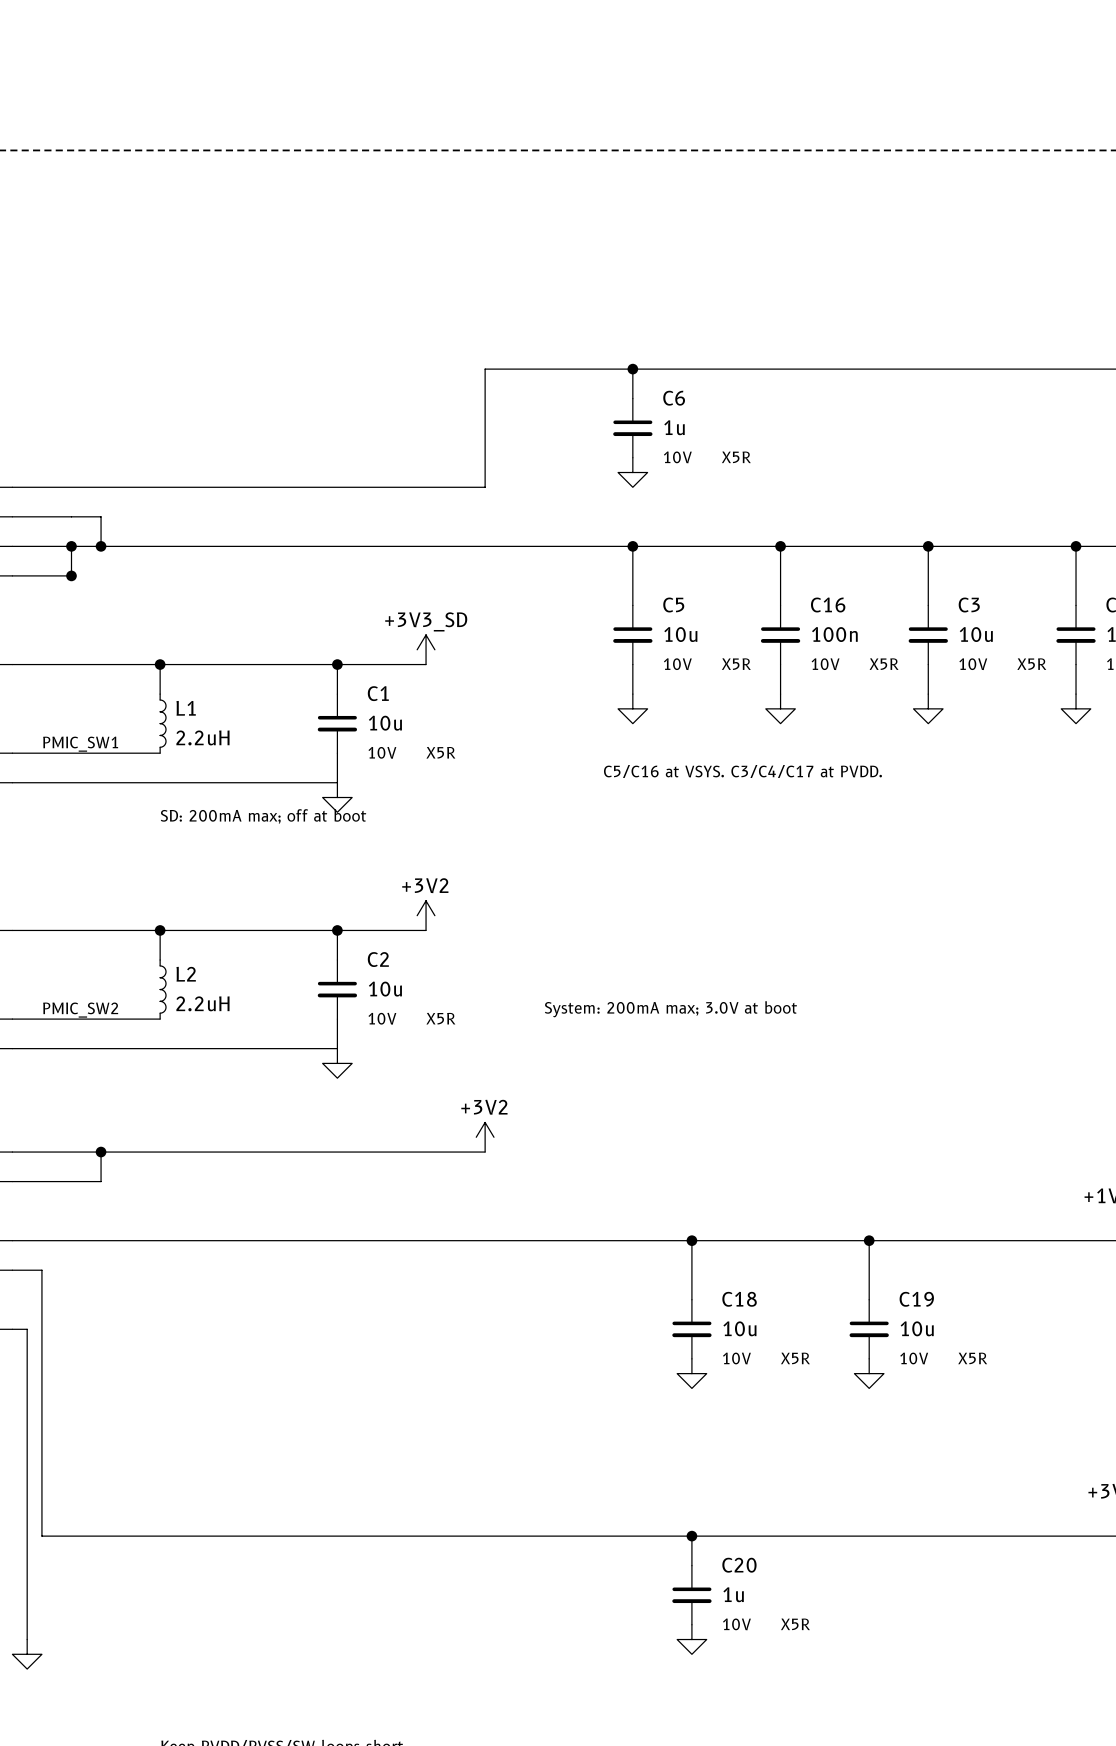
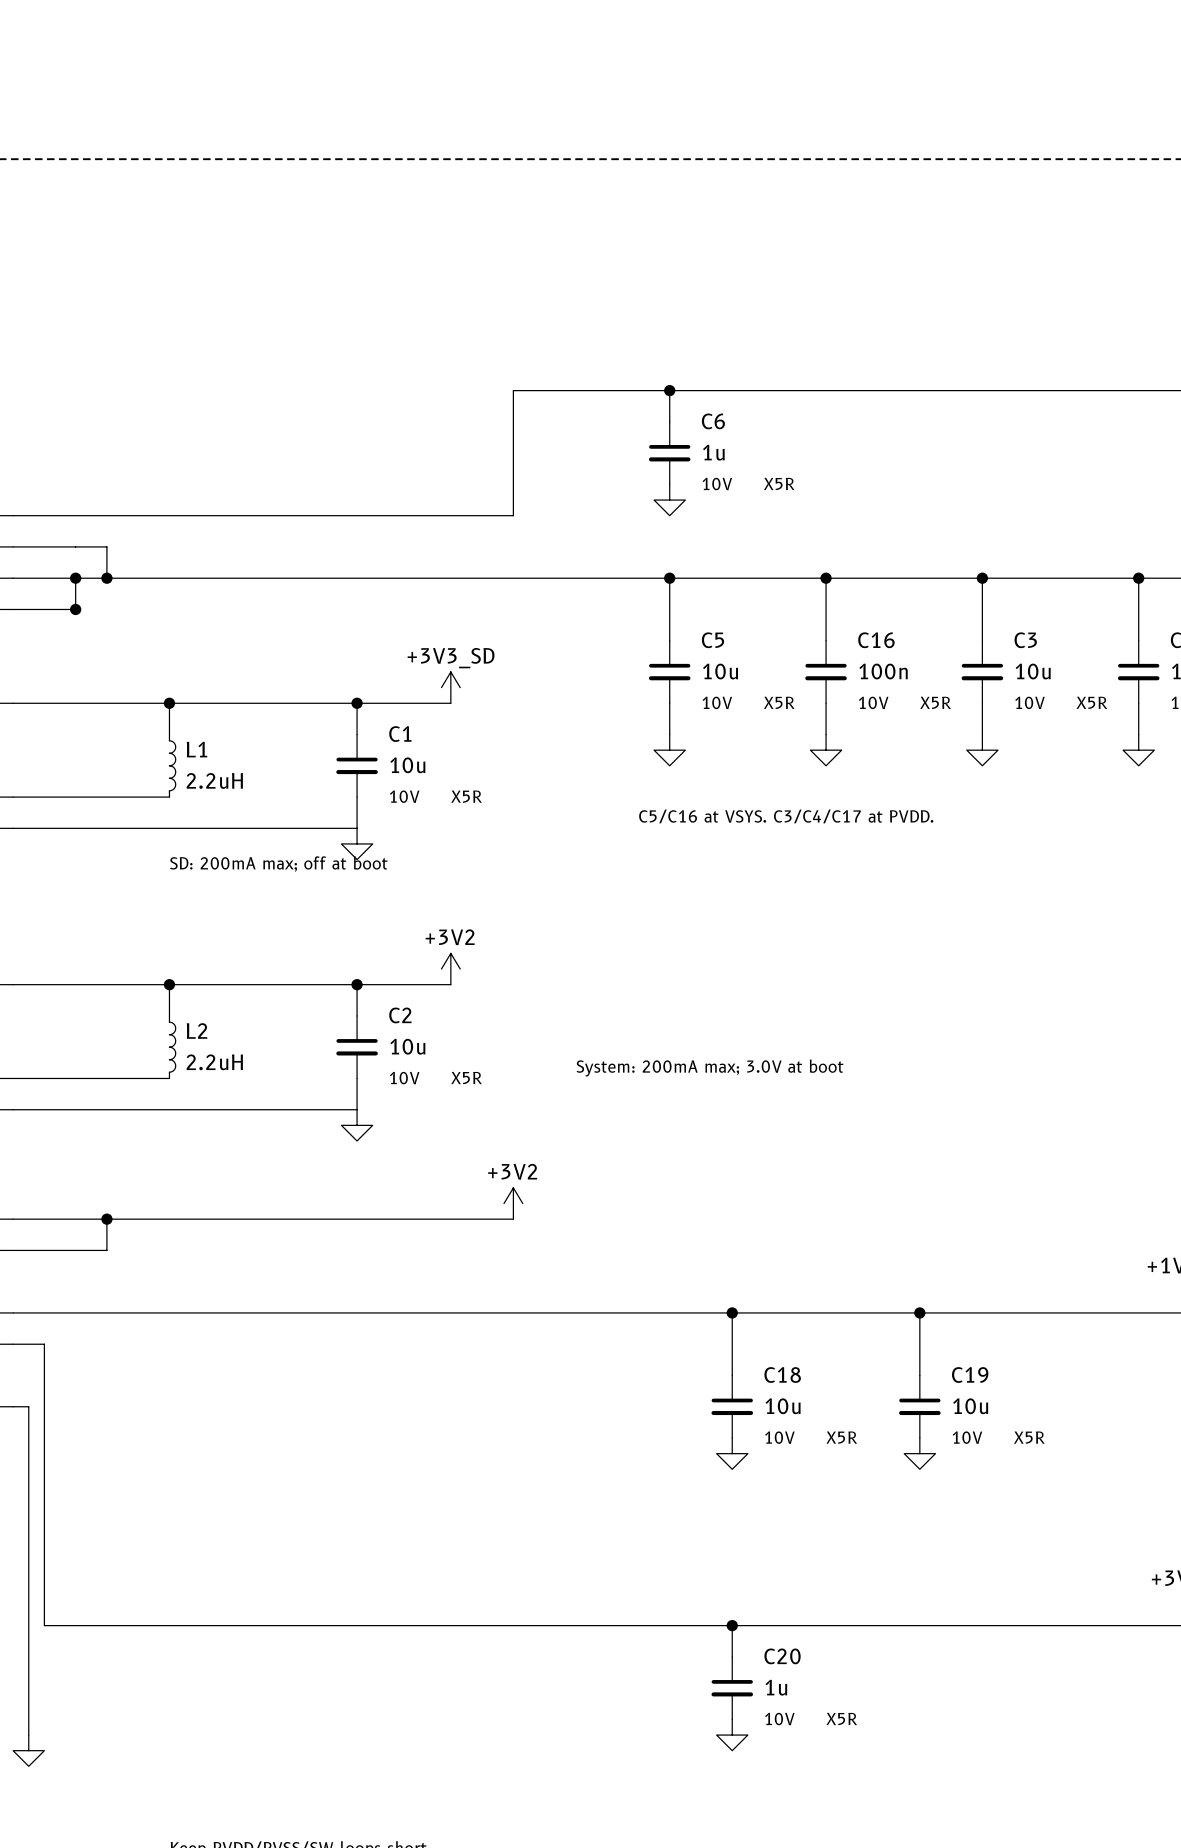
label: PMIC_SW1 (80, 744) -> none
label: PMIC_SW2 (80, 1010) -> none

